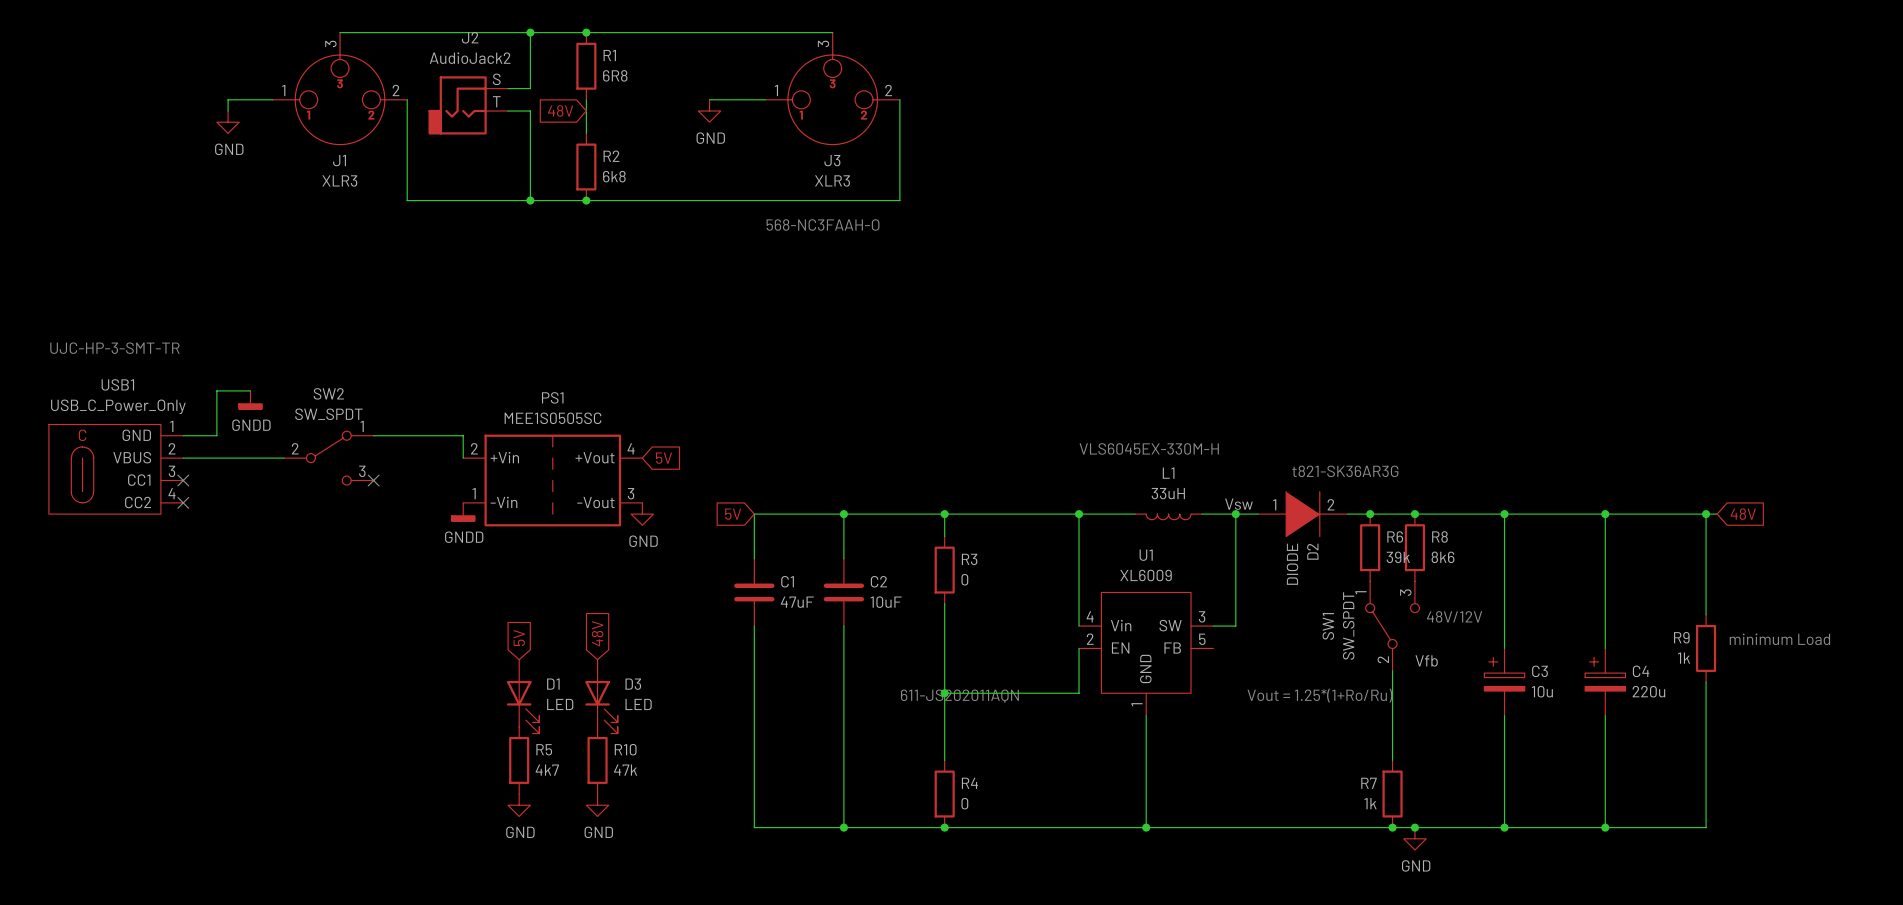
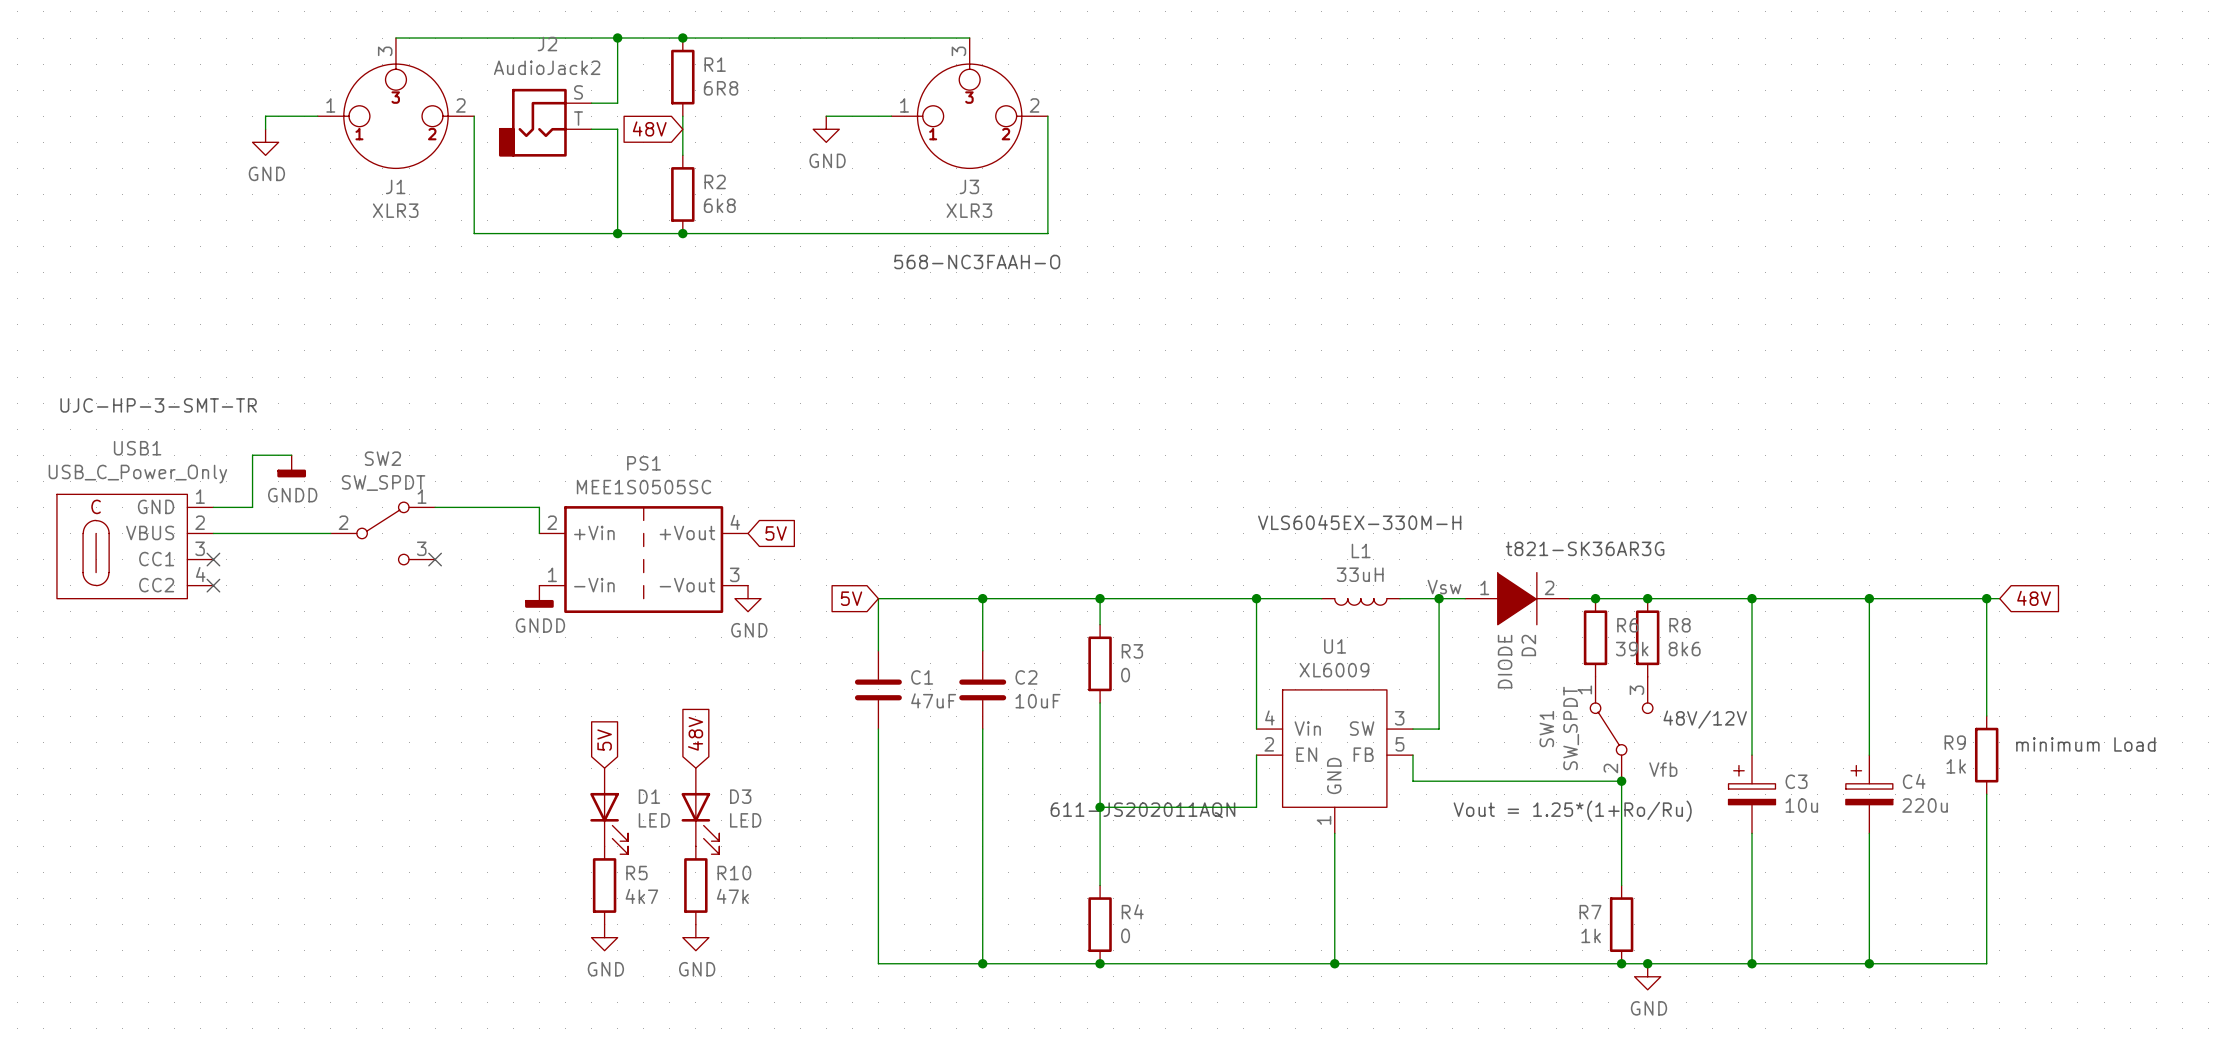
wire: none -> (1412, 755) (1412, 781) (1621, 781)
junction: none -> (1621, 781)

